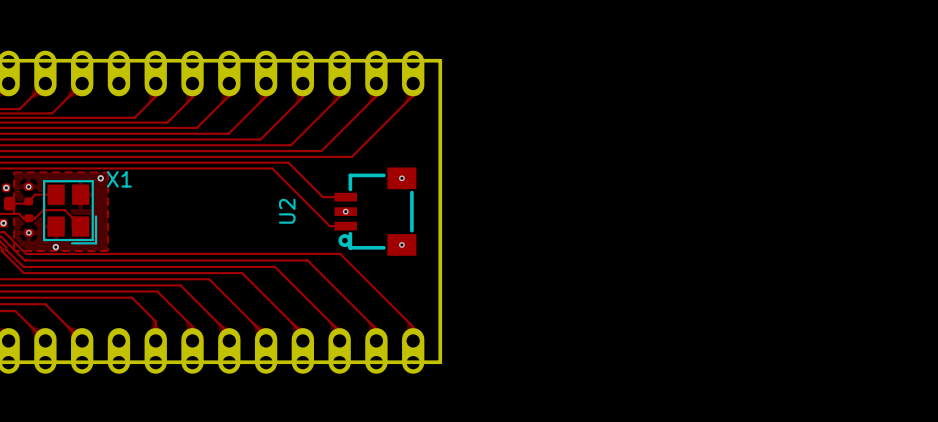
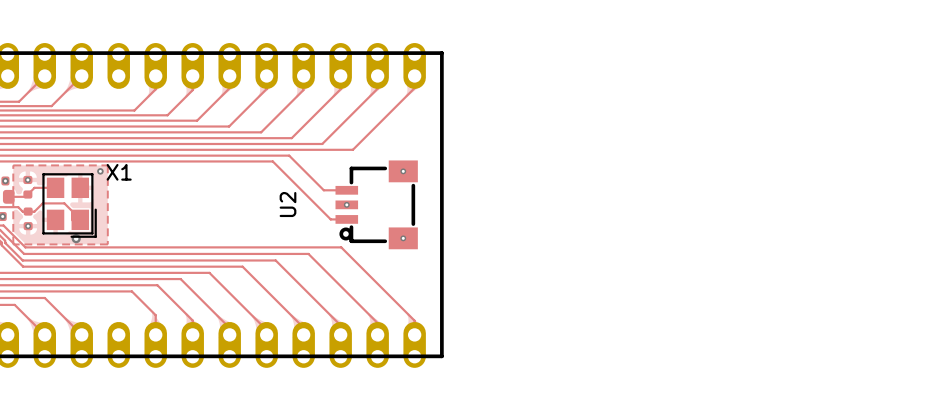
via: none -> (76, 238)
via: (55, 247) -> none

